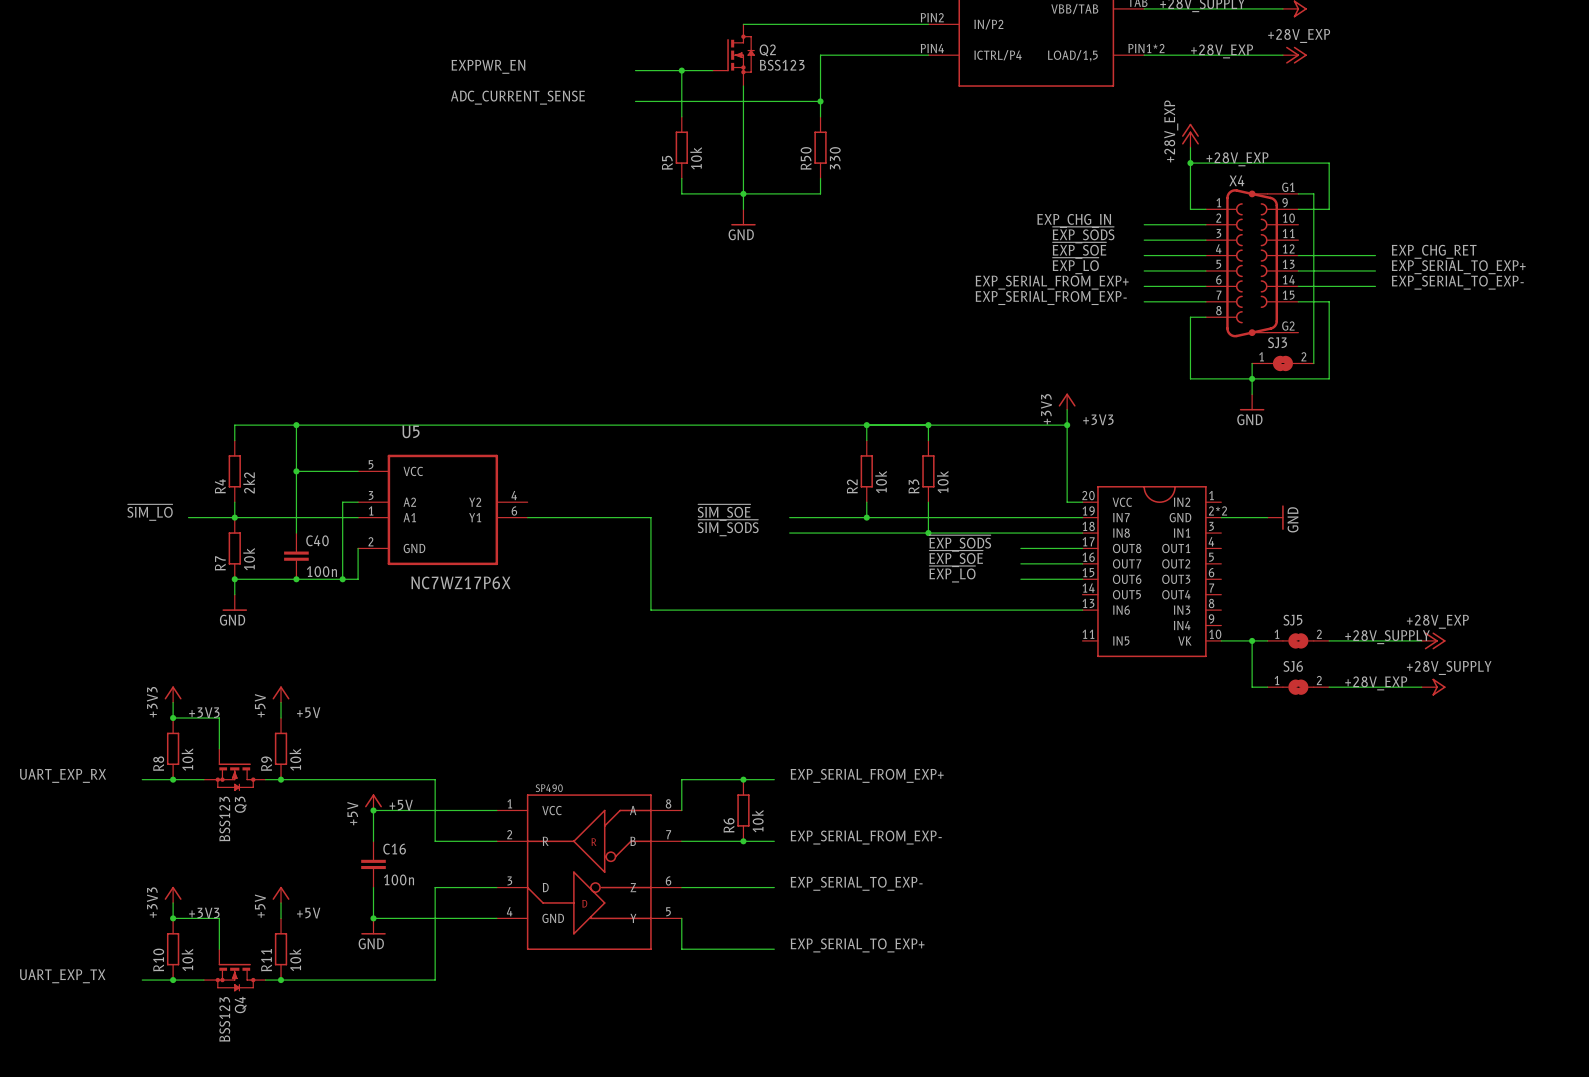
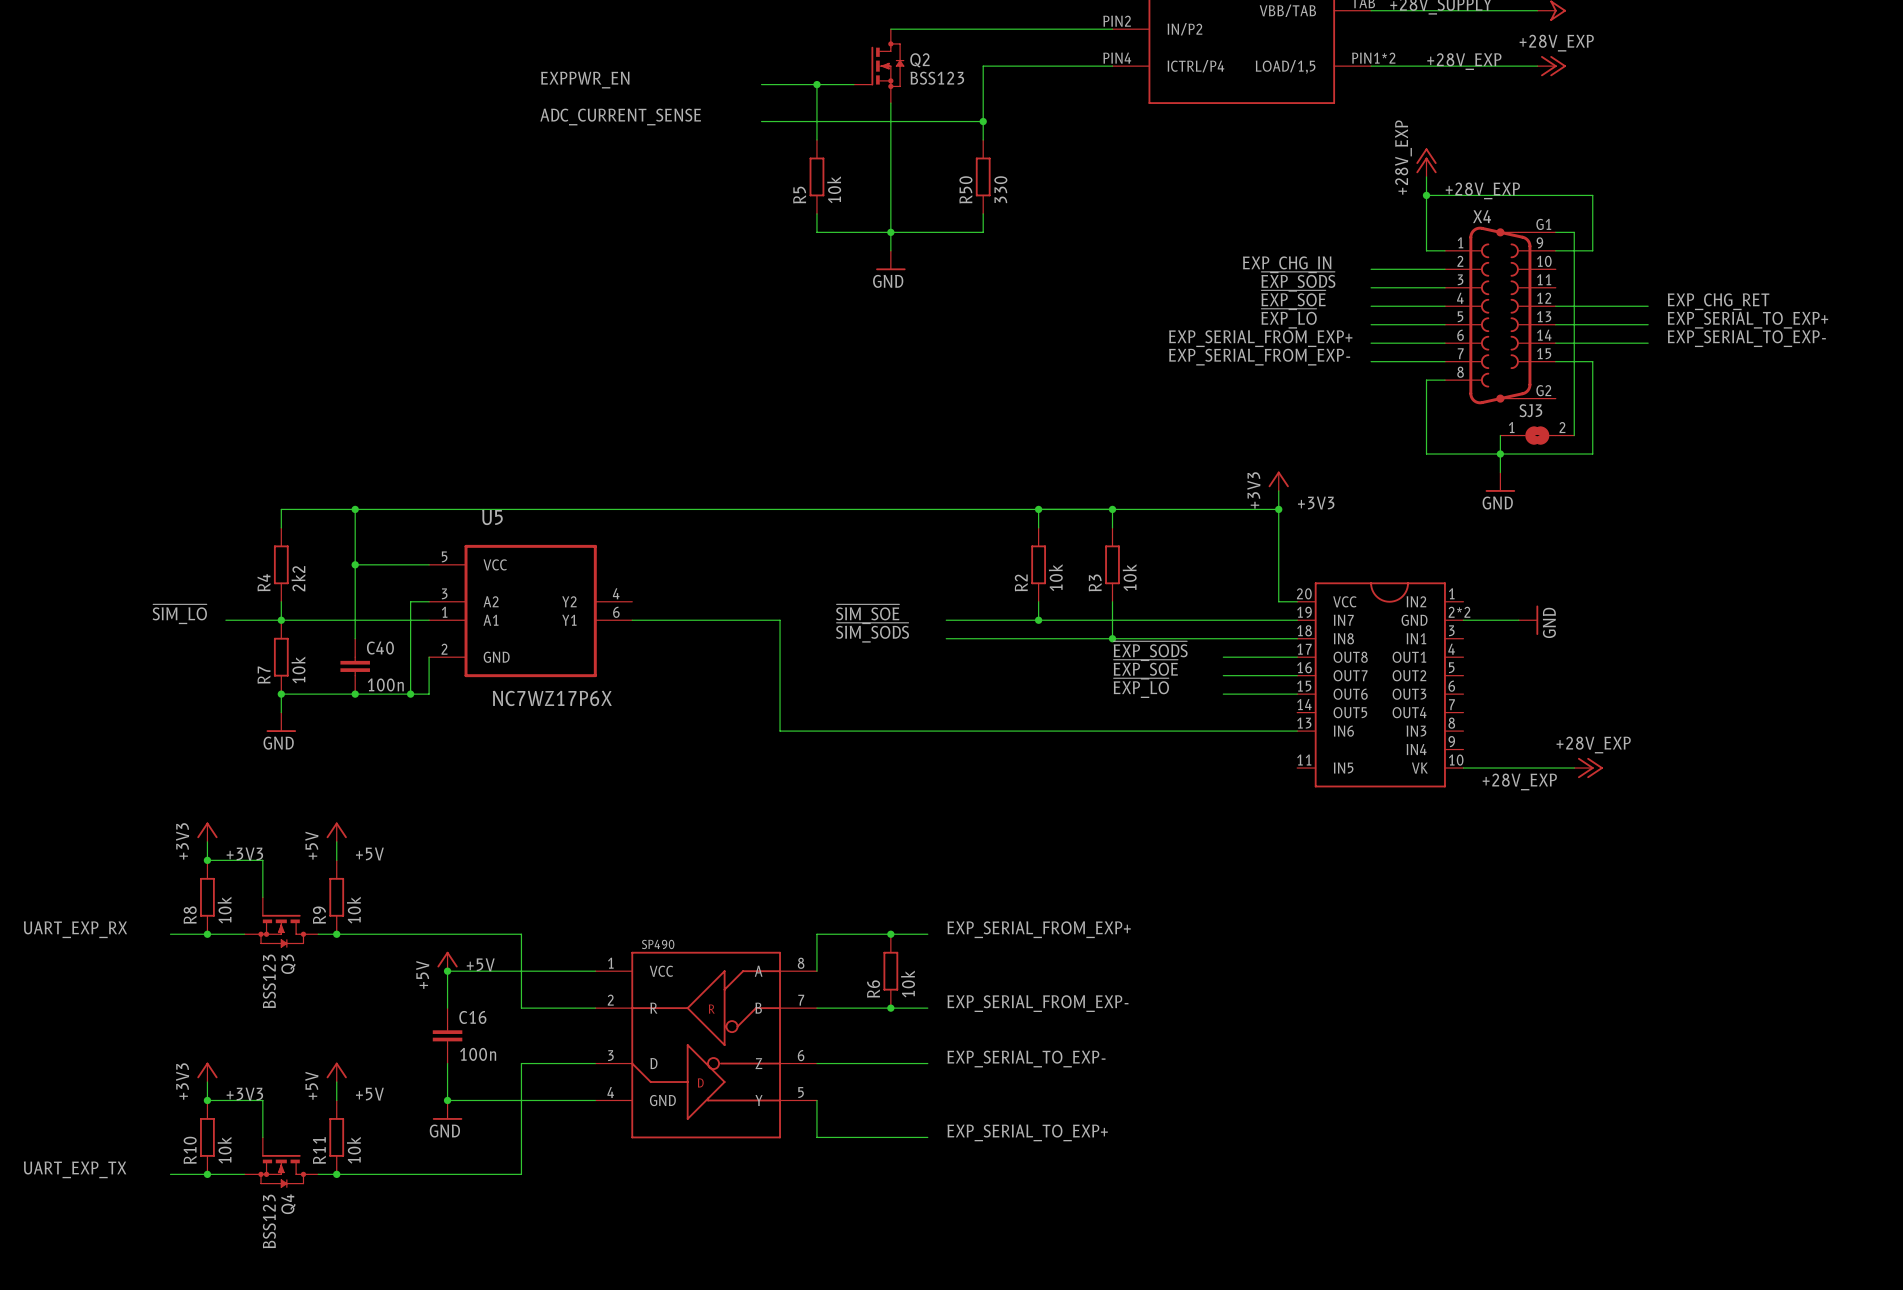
label: +28V_SUPPLY (1387, 637) -> none
wire: (1252, 640) (1252, 687) (1267, 687) -> none
junction: (1252, 640) -> none
SJ5: (1298, 640) -> none
wire: (1329, 640) (1421, 640) -> none
power symbol position: +28V_EXP (1433, 640) -> +28V_EXP (1588, 768)
label position: +28V_EXP (1376, 683) -> +28V_EXP (1519, 781)
SJ6: (1298, 687) -> none
wire: (1329, 687) (1421, 687) -> none
power symbol: +28V_SUPPLY (1433, 687) -> none

